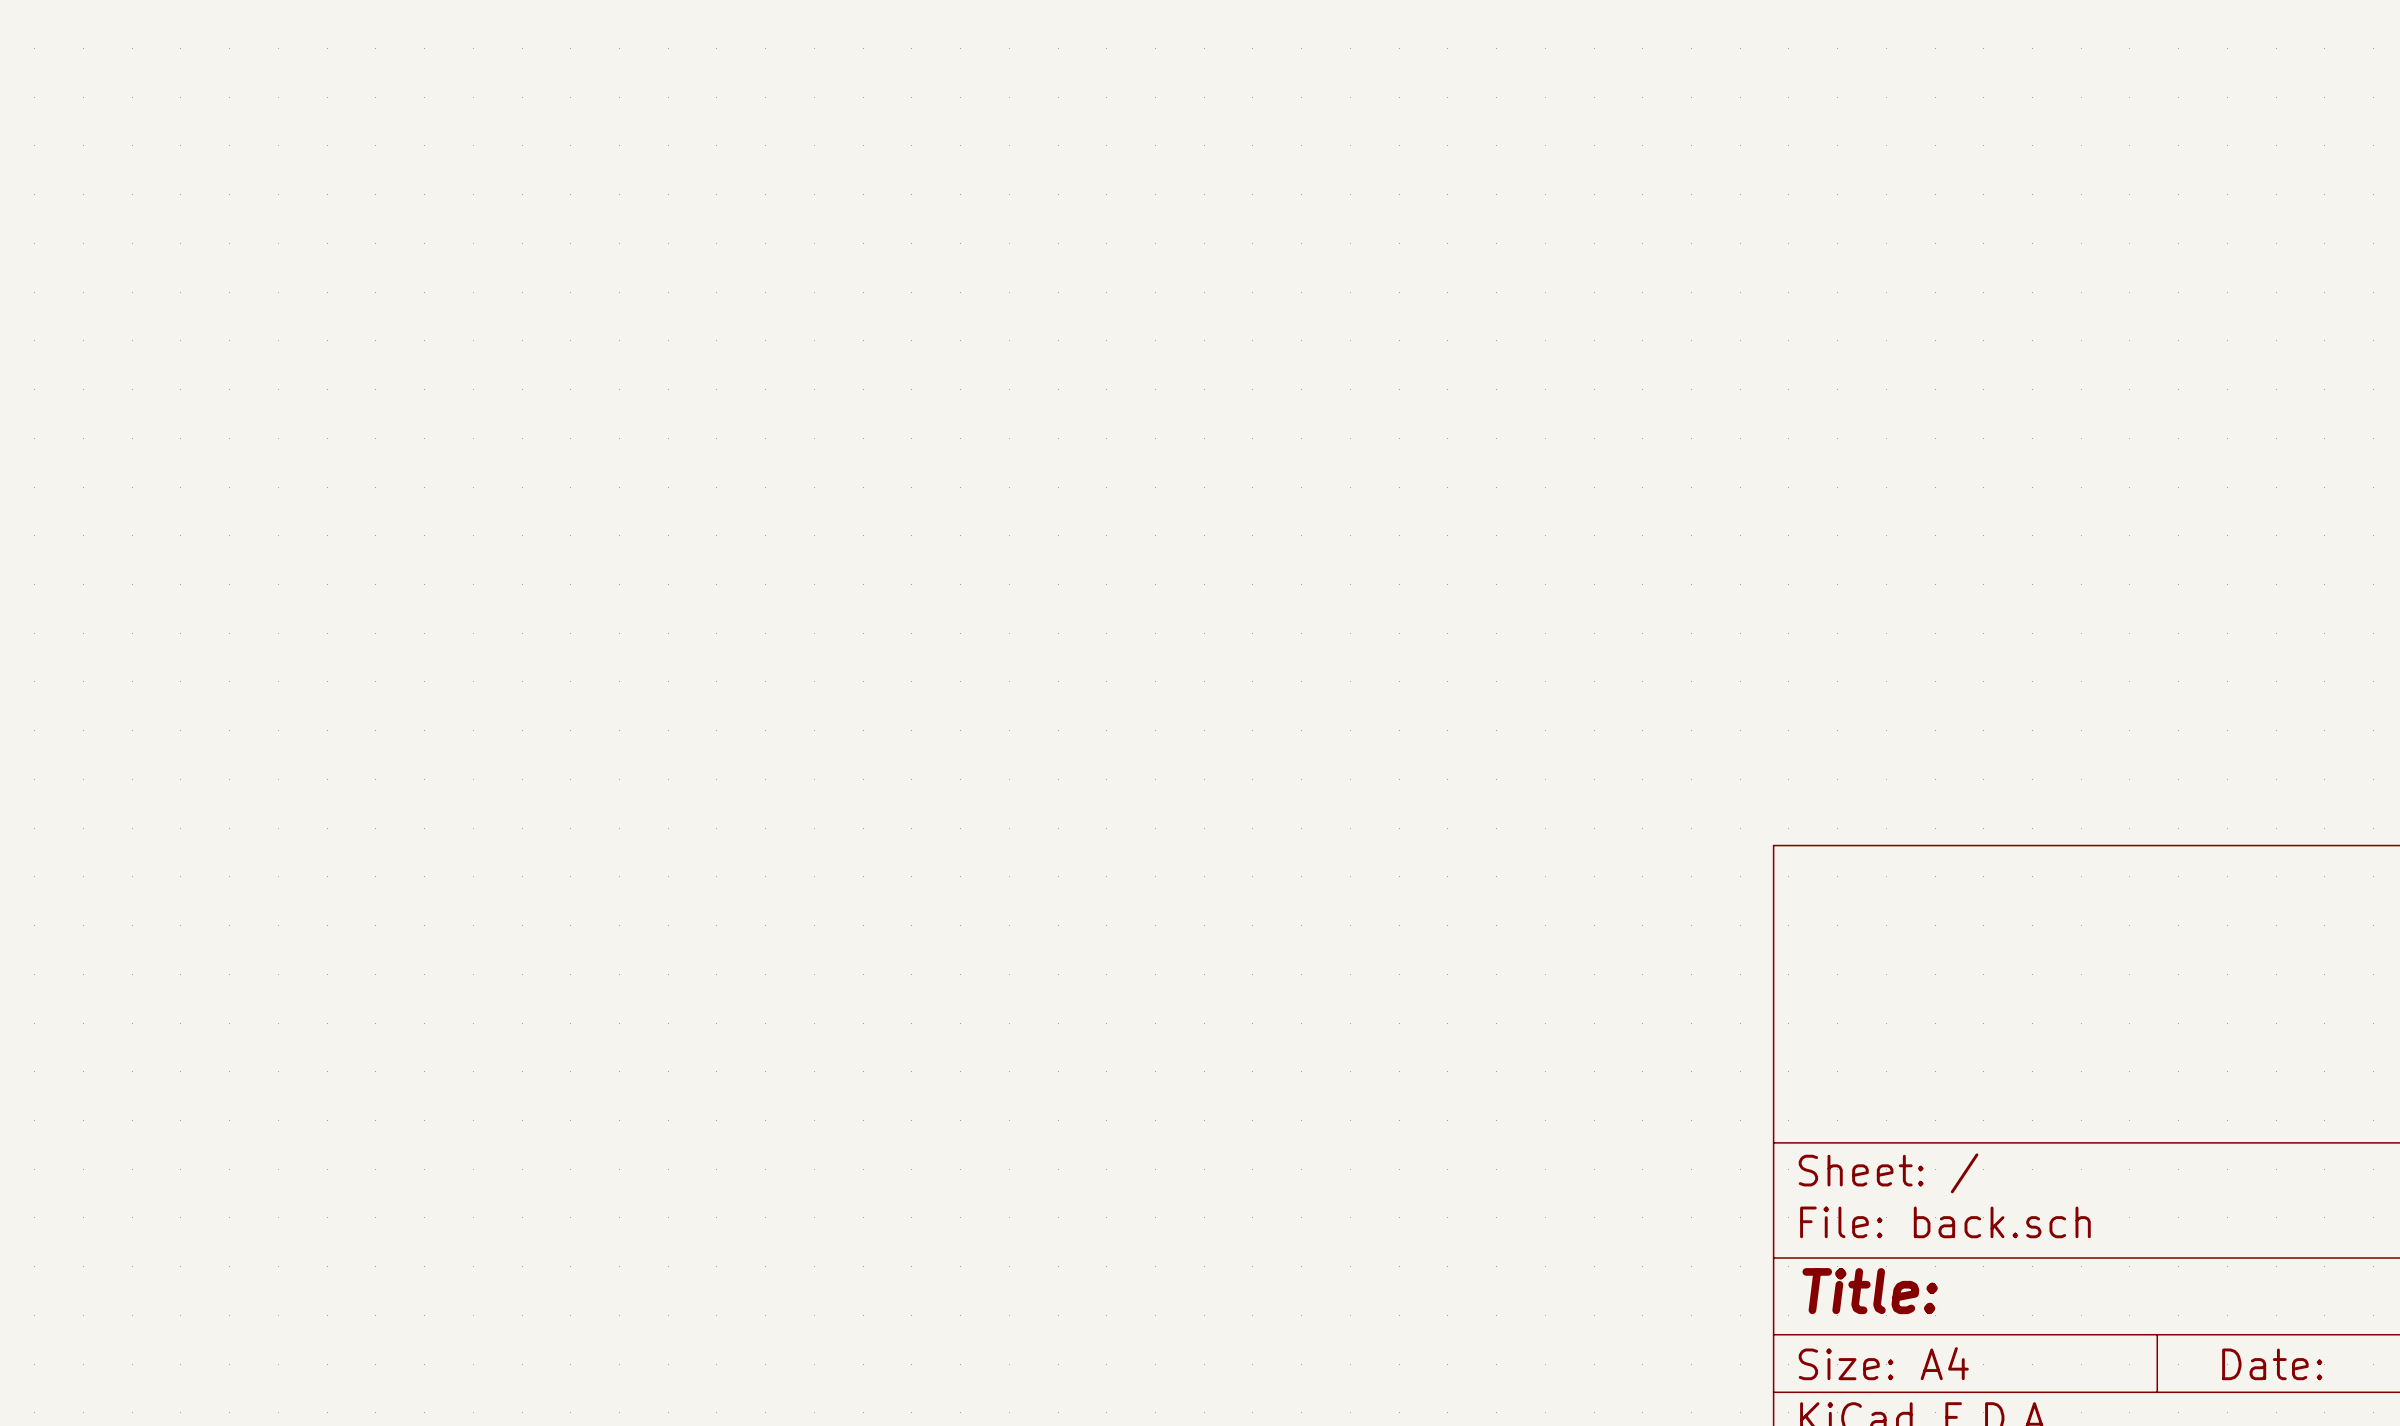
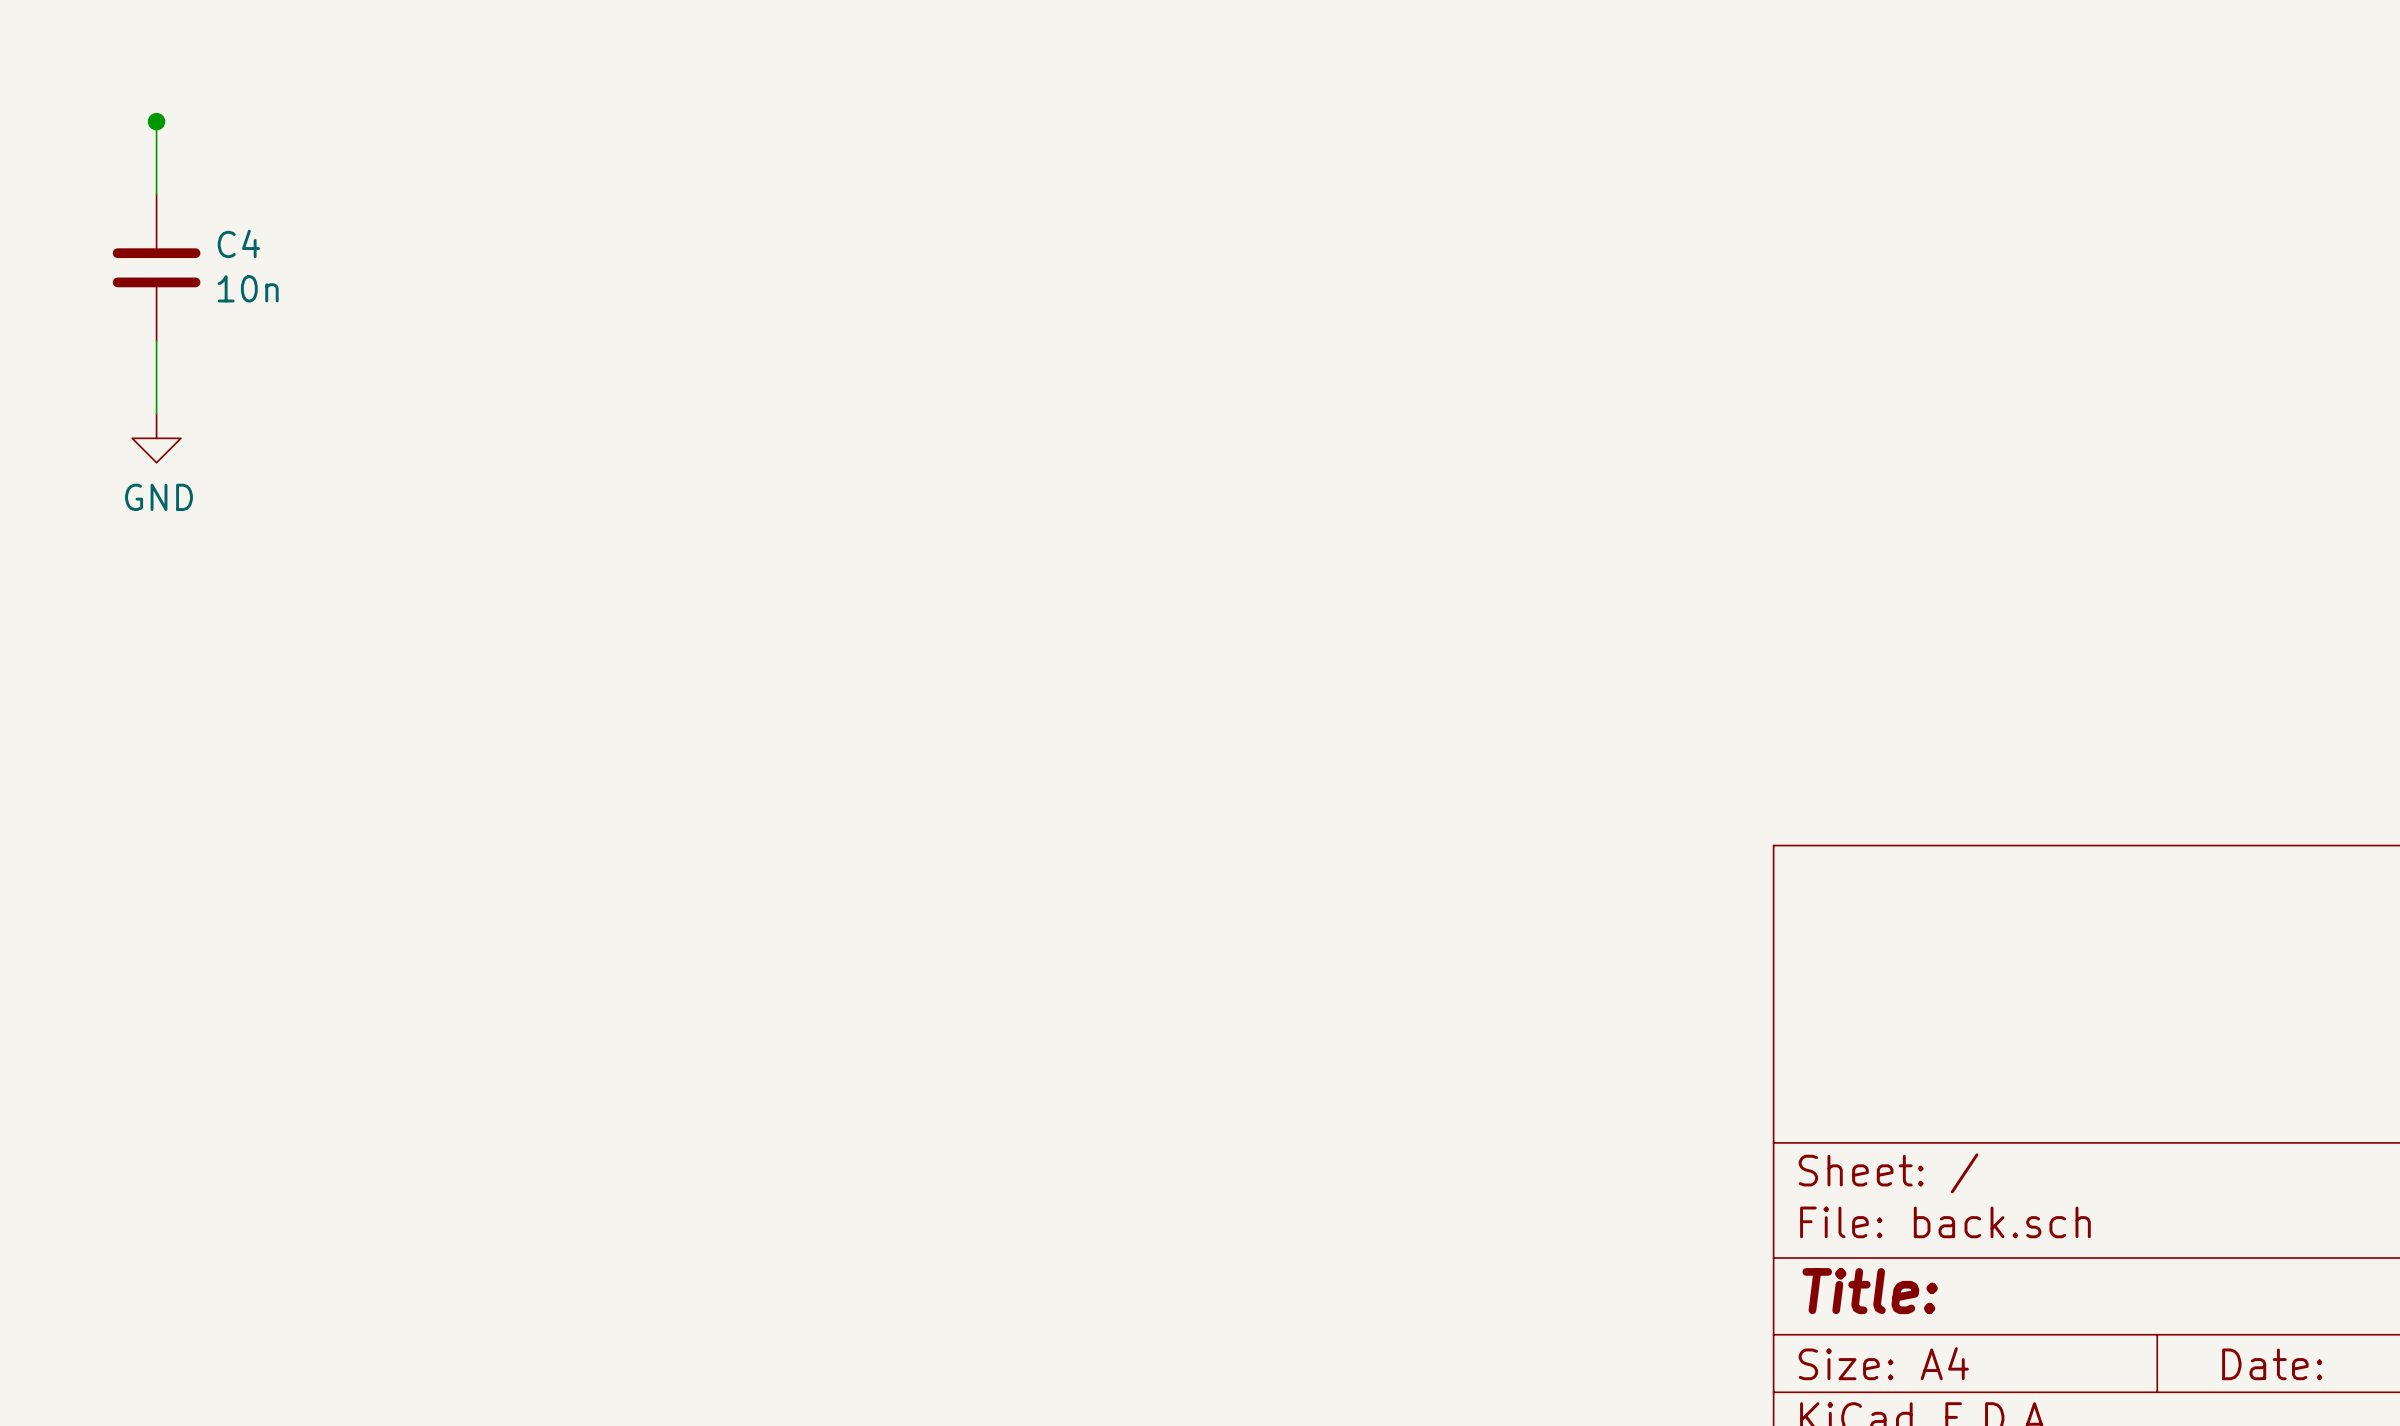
wire: none -> (156, 121) (156, 194)
junction: none -> (156, 121)
C4: none -> 10n (156, 267)
wire: none -> (156, 340) (156, 413)
power symbol: none -> GND (156, 438)

